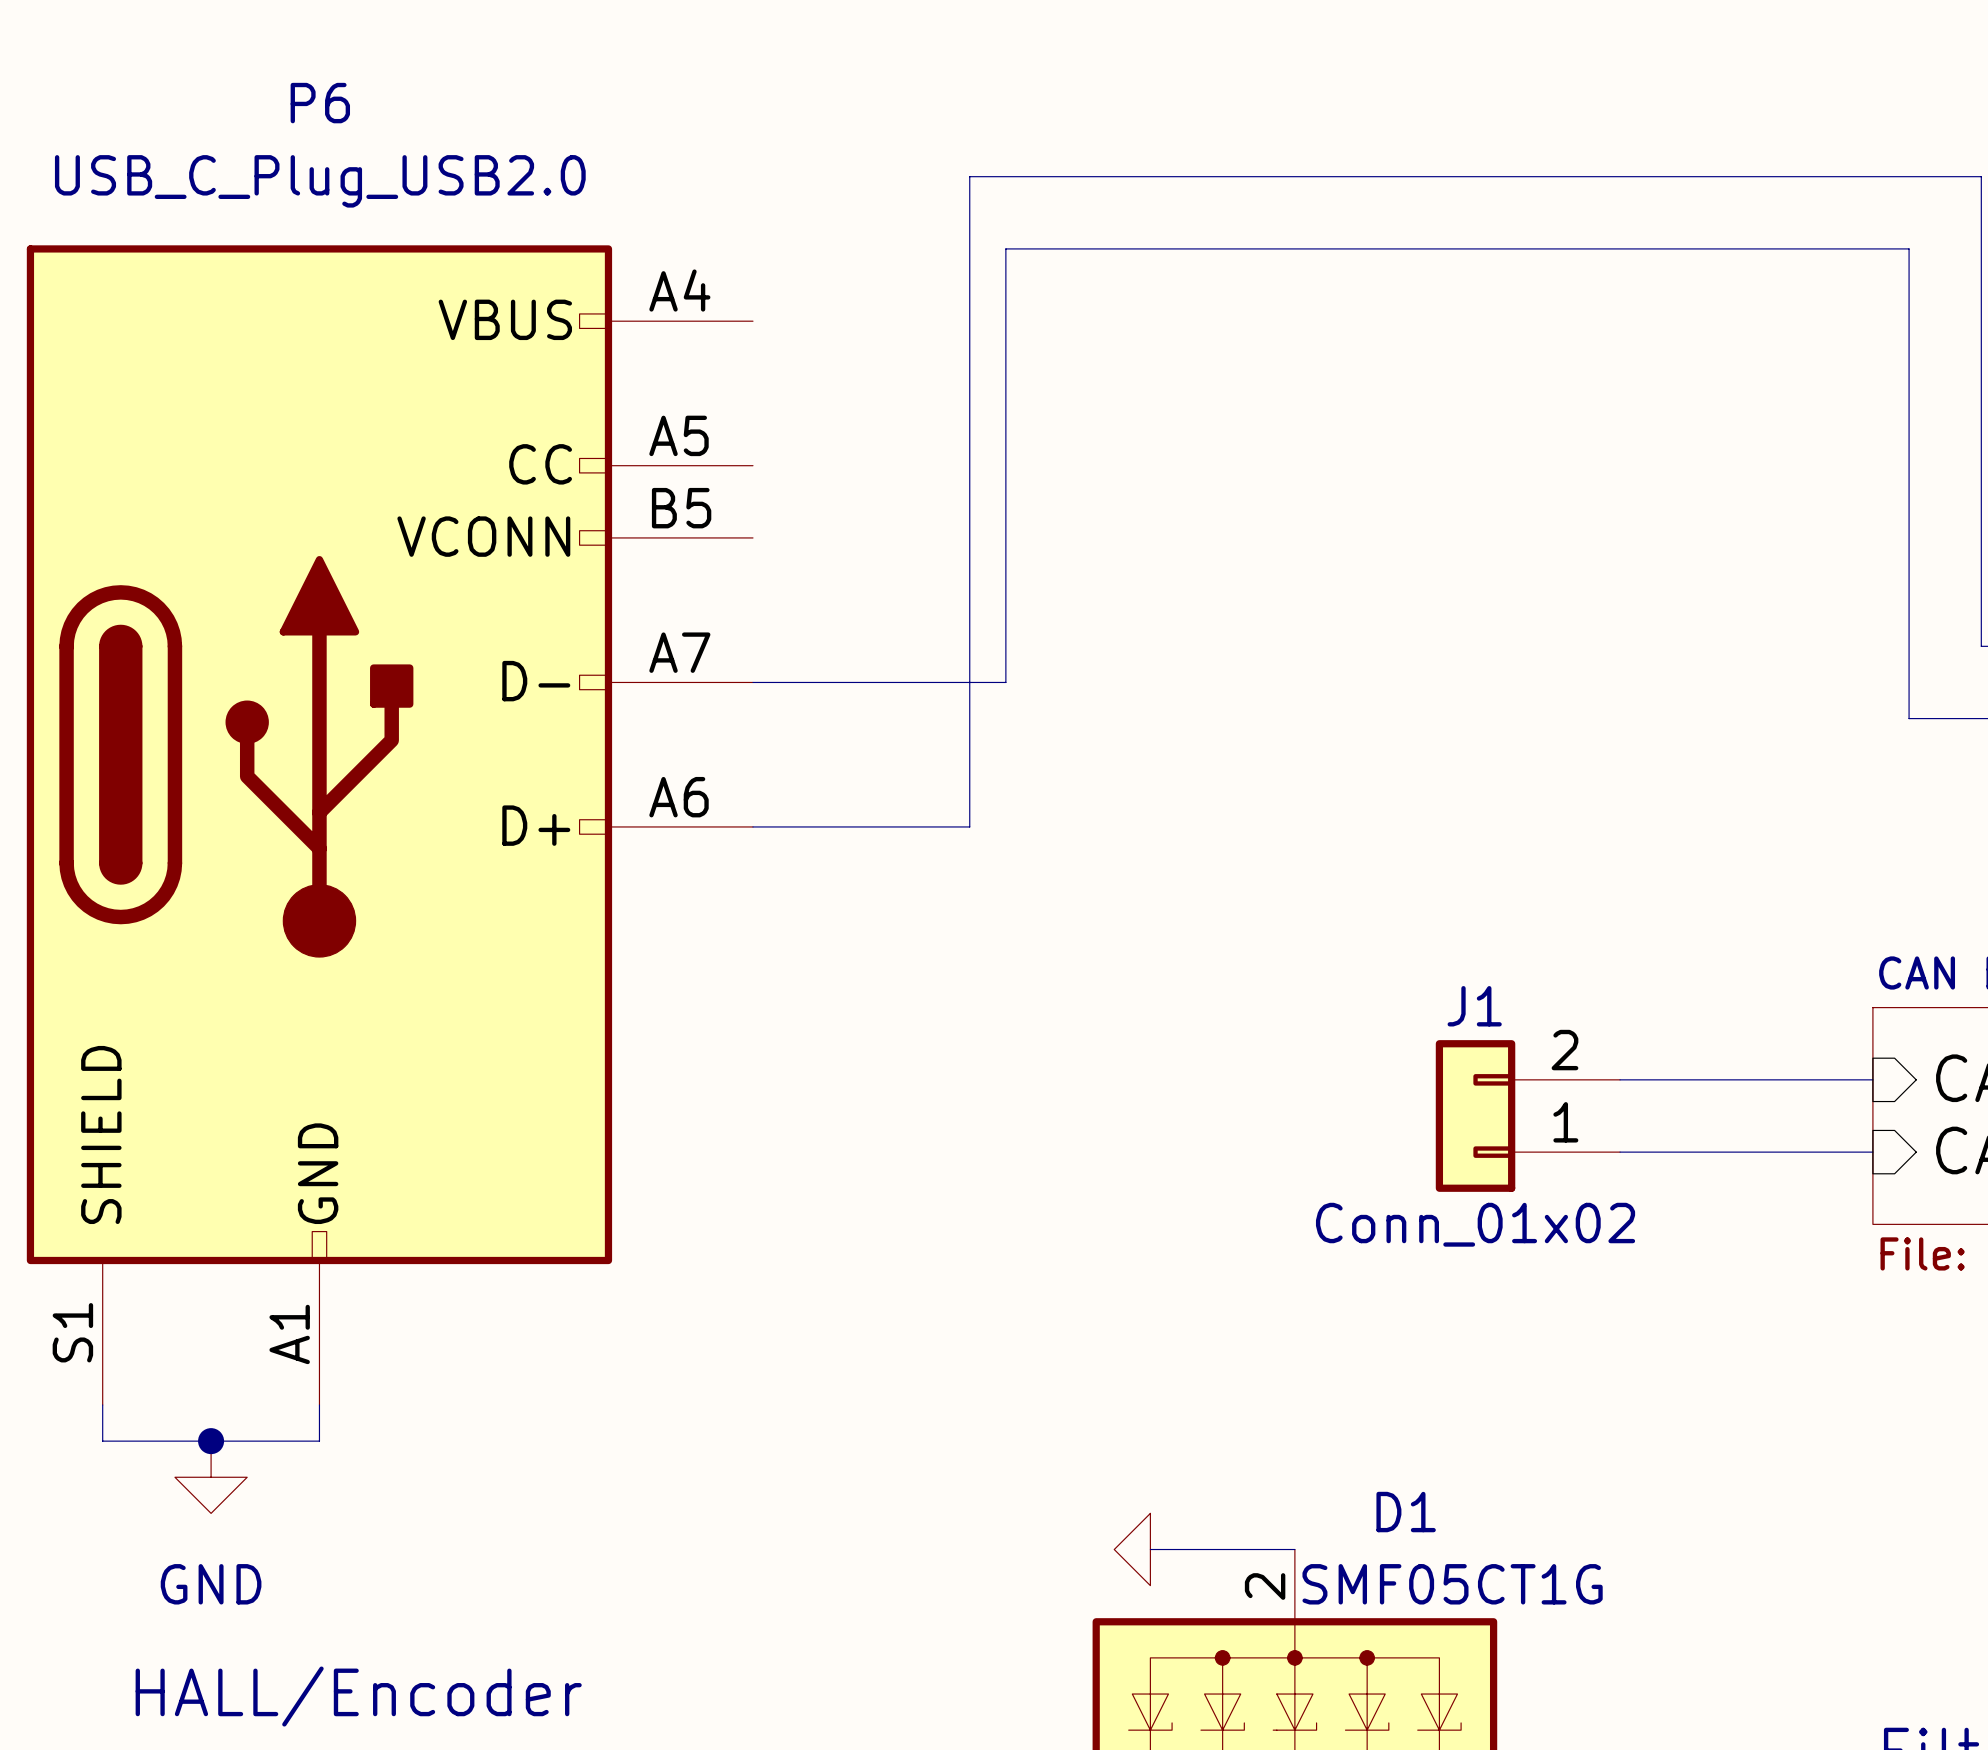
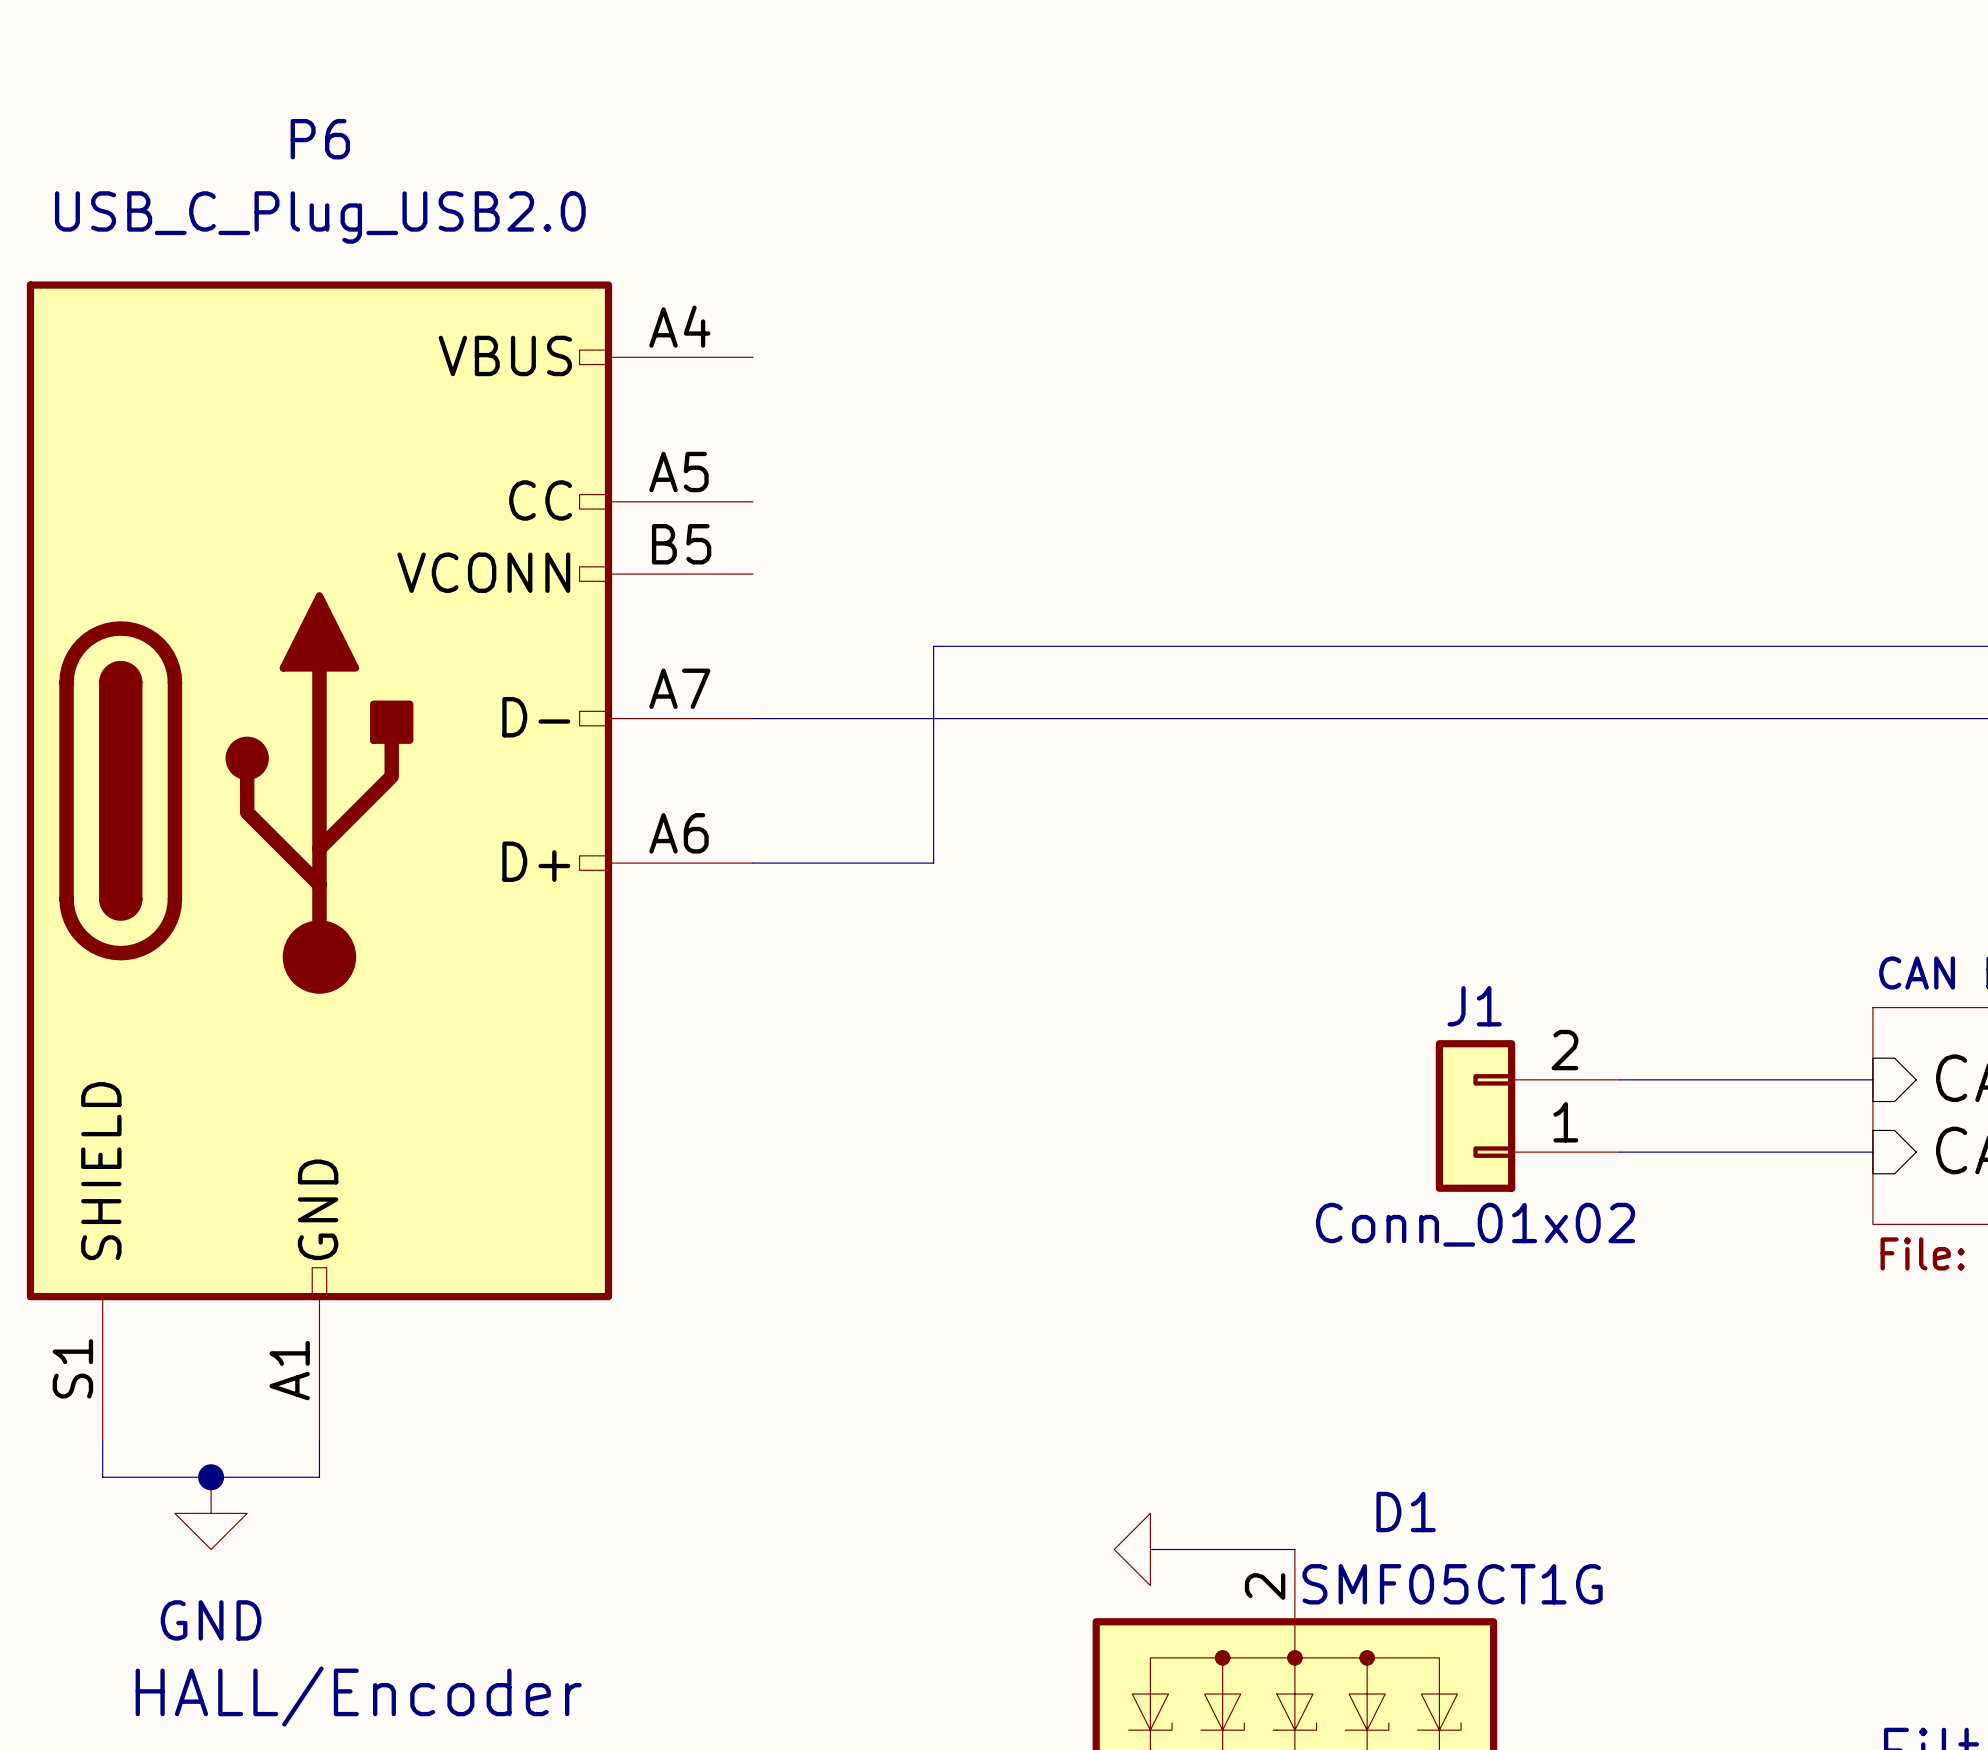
wire: (1981, 646) (1981, 176) (969, 176) (969, 826) (752, 826) -> (1981, 646) (933, 646) (933, 863) (752, 863)
wire: (752, 682) (1005, 682) (1005, 248) (1909, 248) (1909, 718) -> (752, 718) (1909, 718)
P6 position: (389, 825) -> (389, 861)
wire: (102, 1405) (102, 1441) (319, 1441) (319, 1405) -> (102, 1441) (102, 1477) (319, 1477) (319, 1441)
junction position: (211, 1441) -> (211, 1477)
power symbol position: GND (211, 1477) -> GND (211, 1513)

